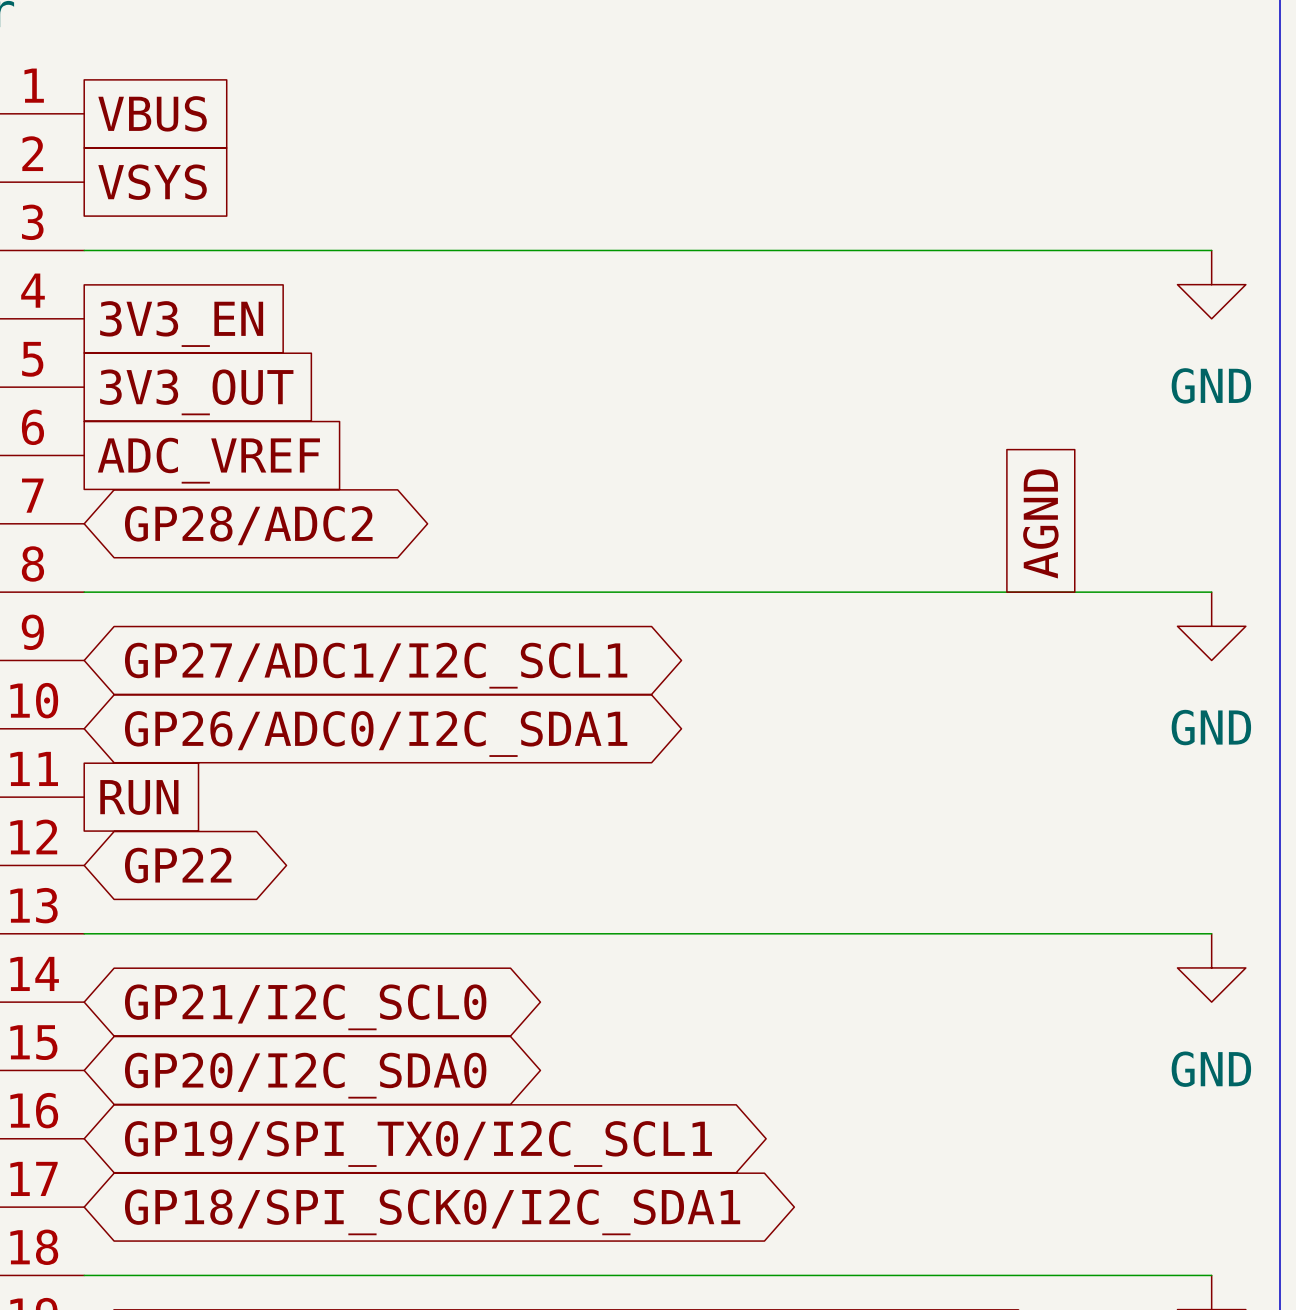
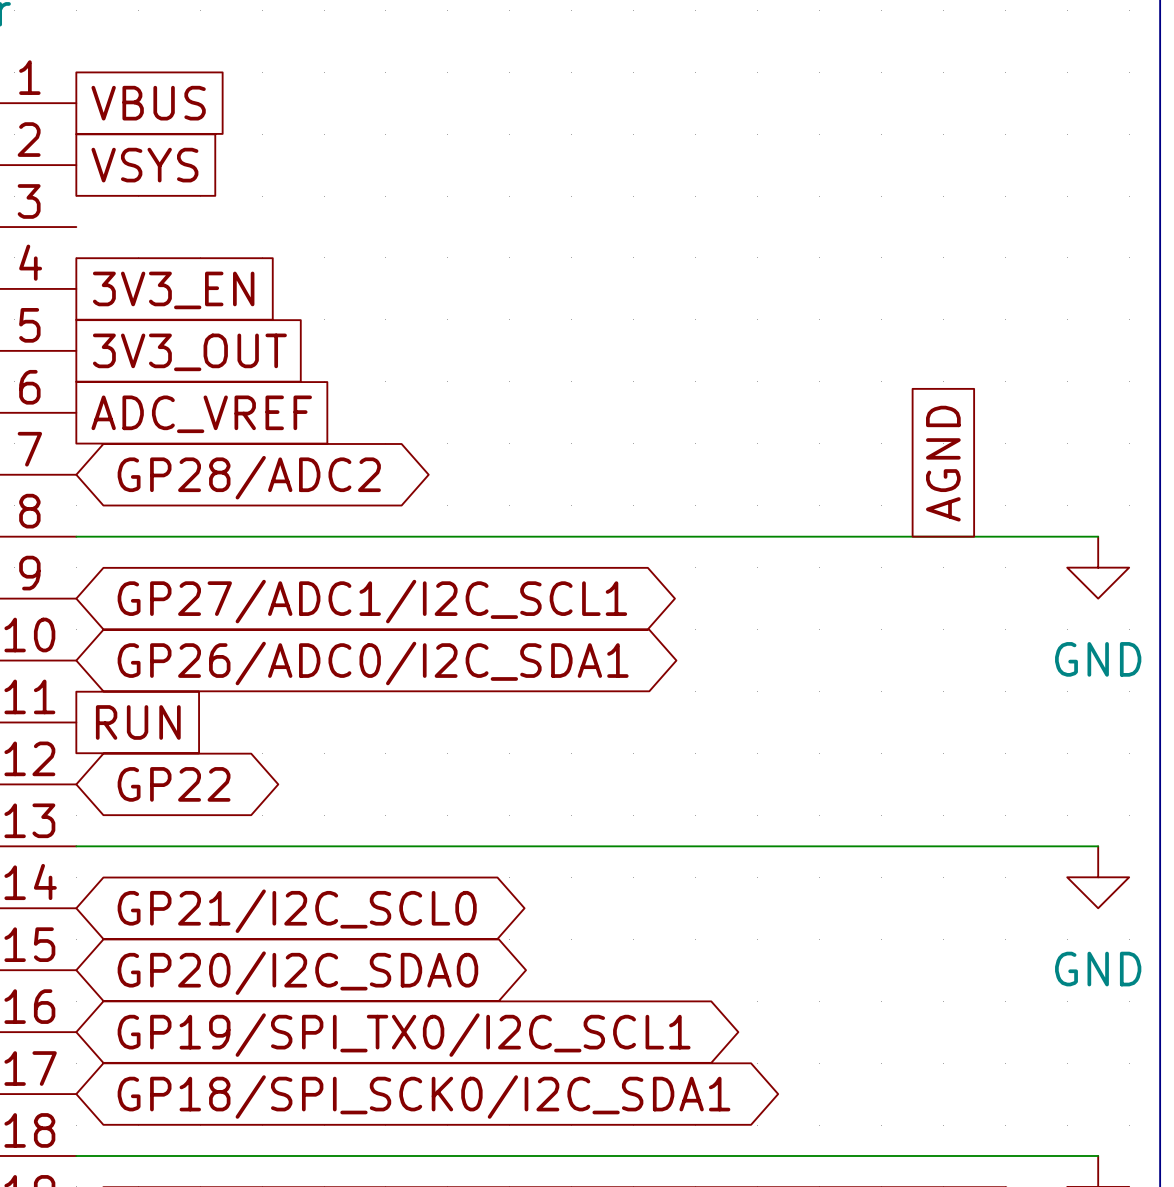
wire: (84, 250) (1211, 250) -> none
power symbol: GND (1211, 284) -> none

